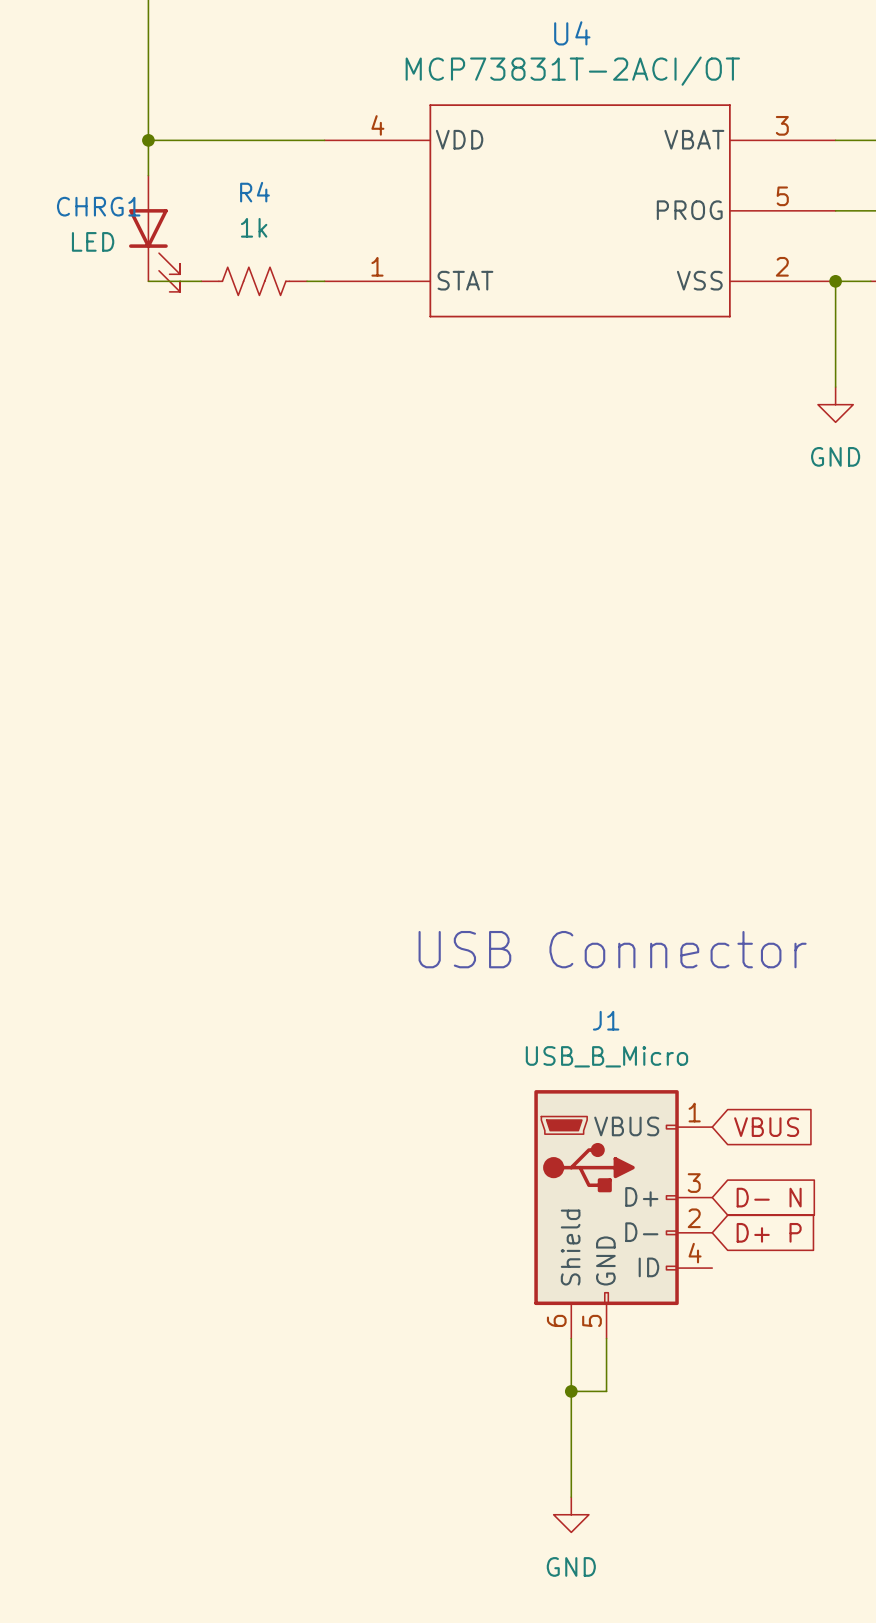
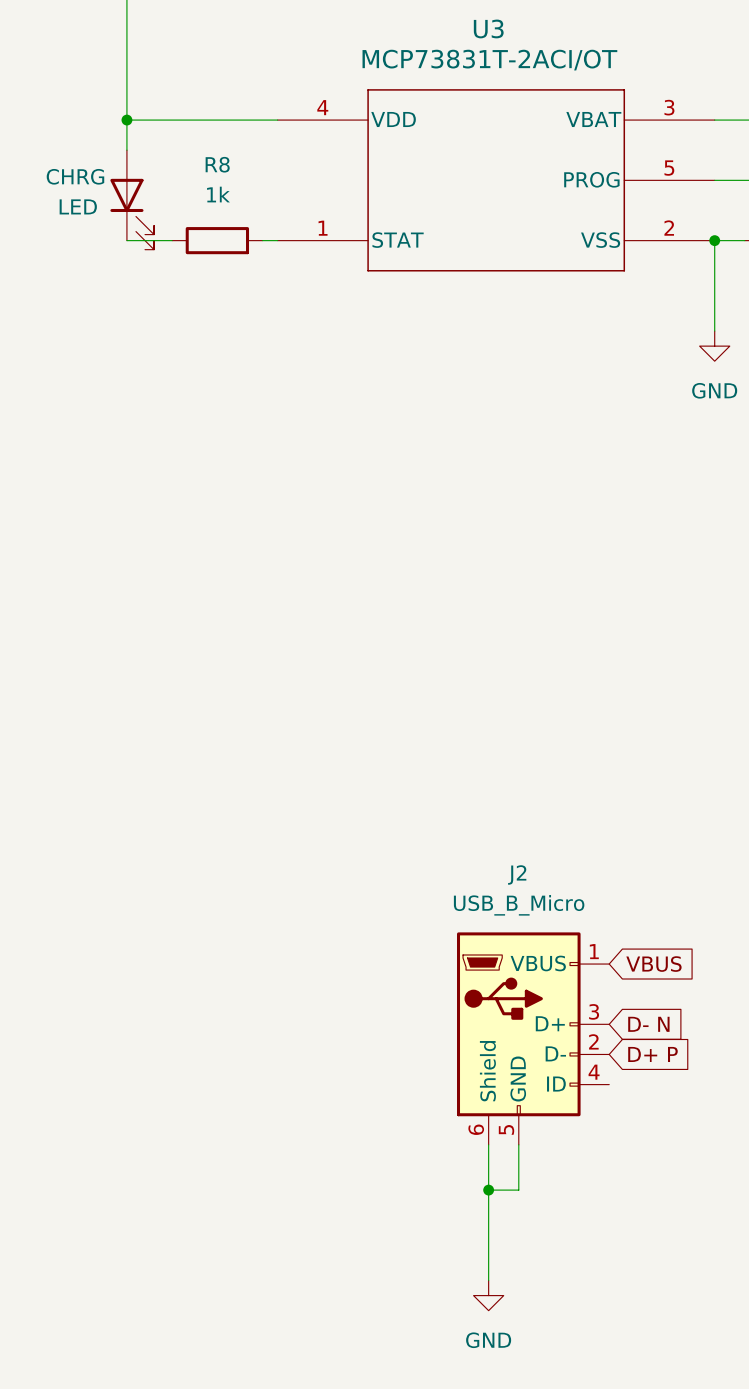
U4 name: U4 (572, 33) -> U3 (488, 28)
CHRG1 name: CHRG1 (98, 206) -> CHRG (75, 176)
R4: 1k (254, 281) -> none
R8: none -> 1k (217, 240)
text: USB Connector (612, 949) -> none
J1 name: J1 (606, 1020) -> J2 (517, 874)

